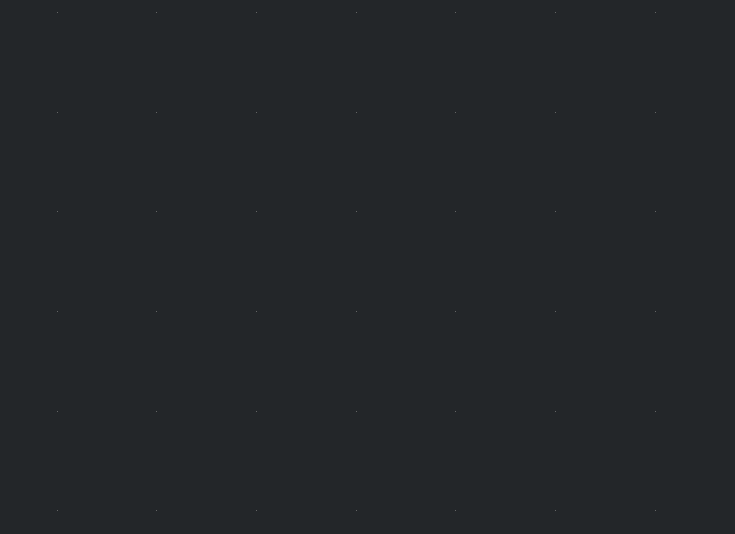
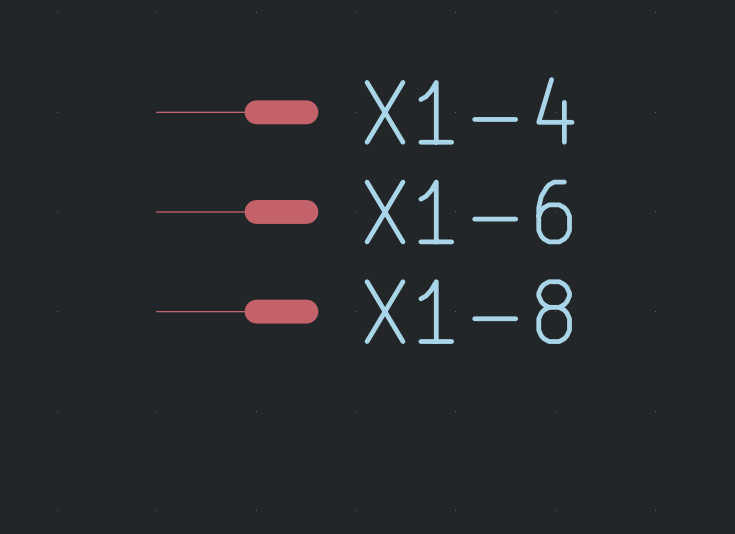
X1-4: none -> (237, 112)
X1-6: none -> (237, 211)
X1-8: none -> (237, 311)

